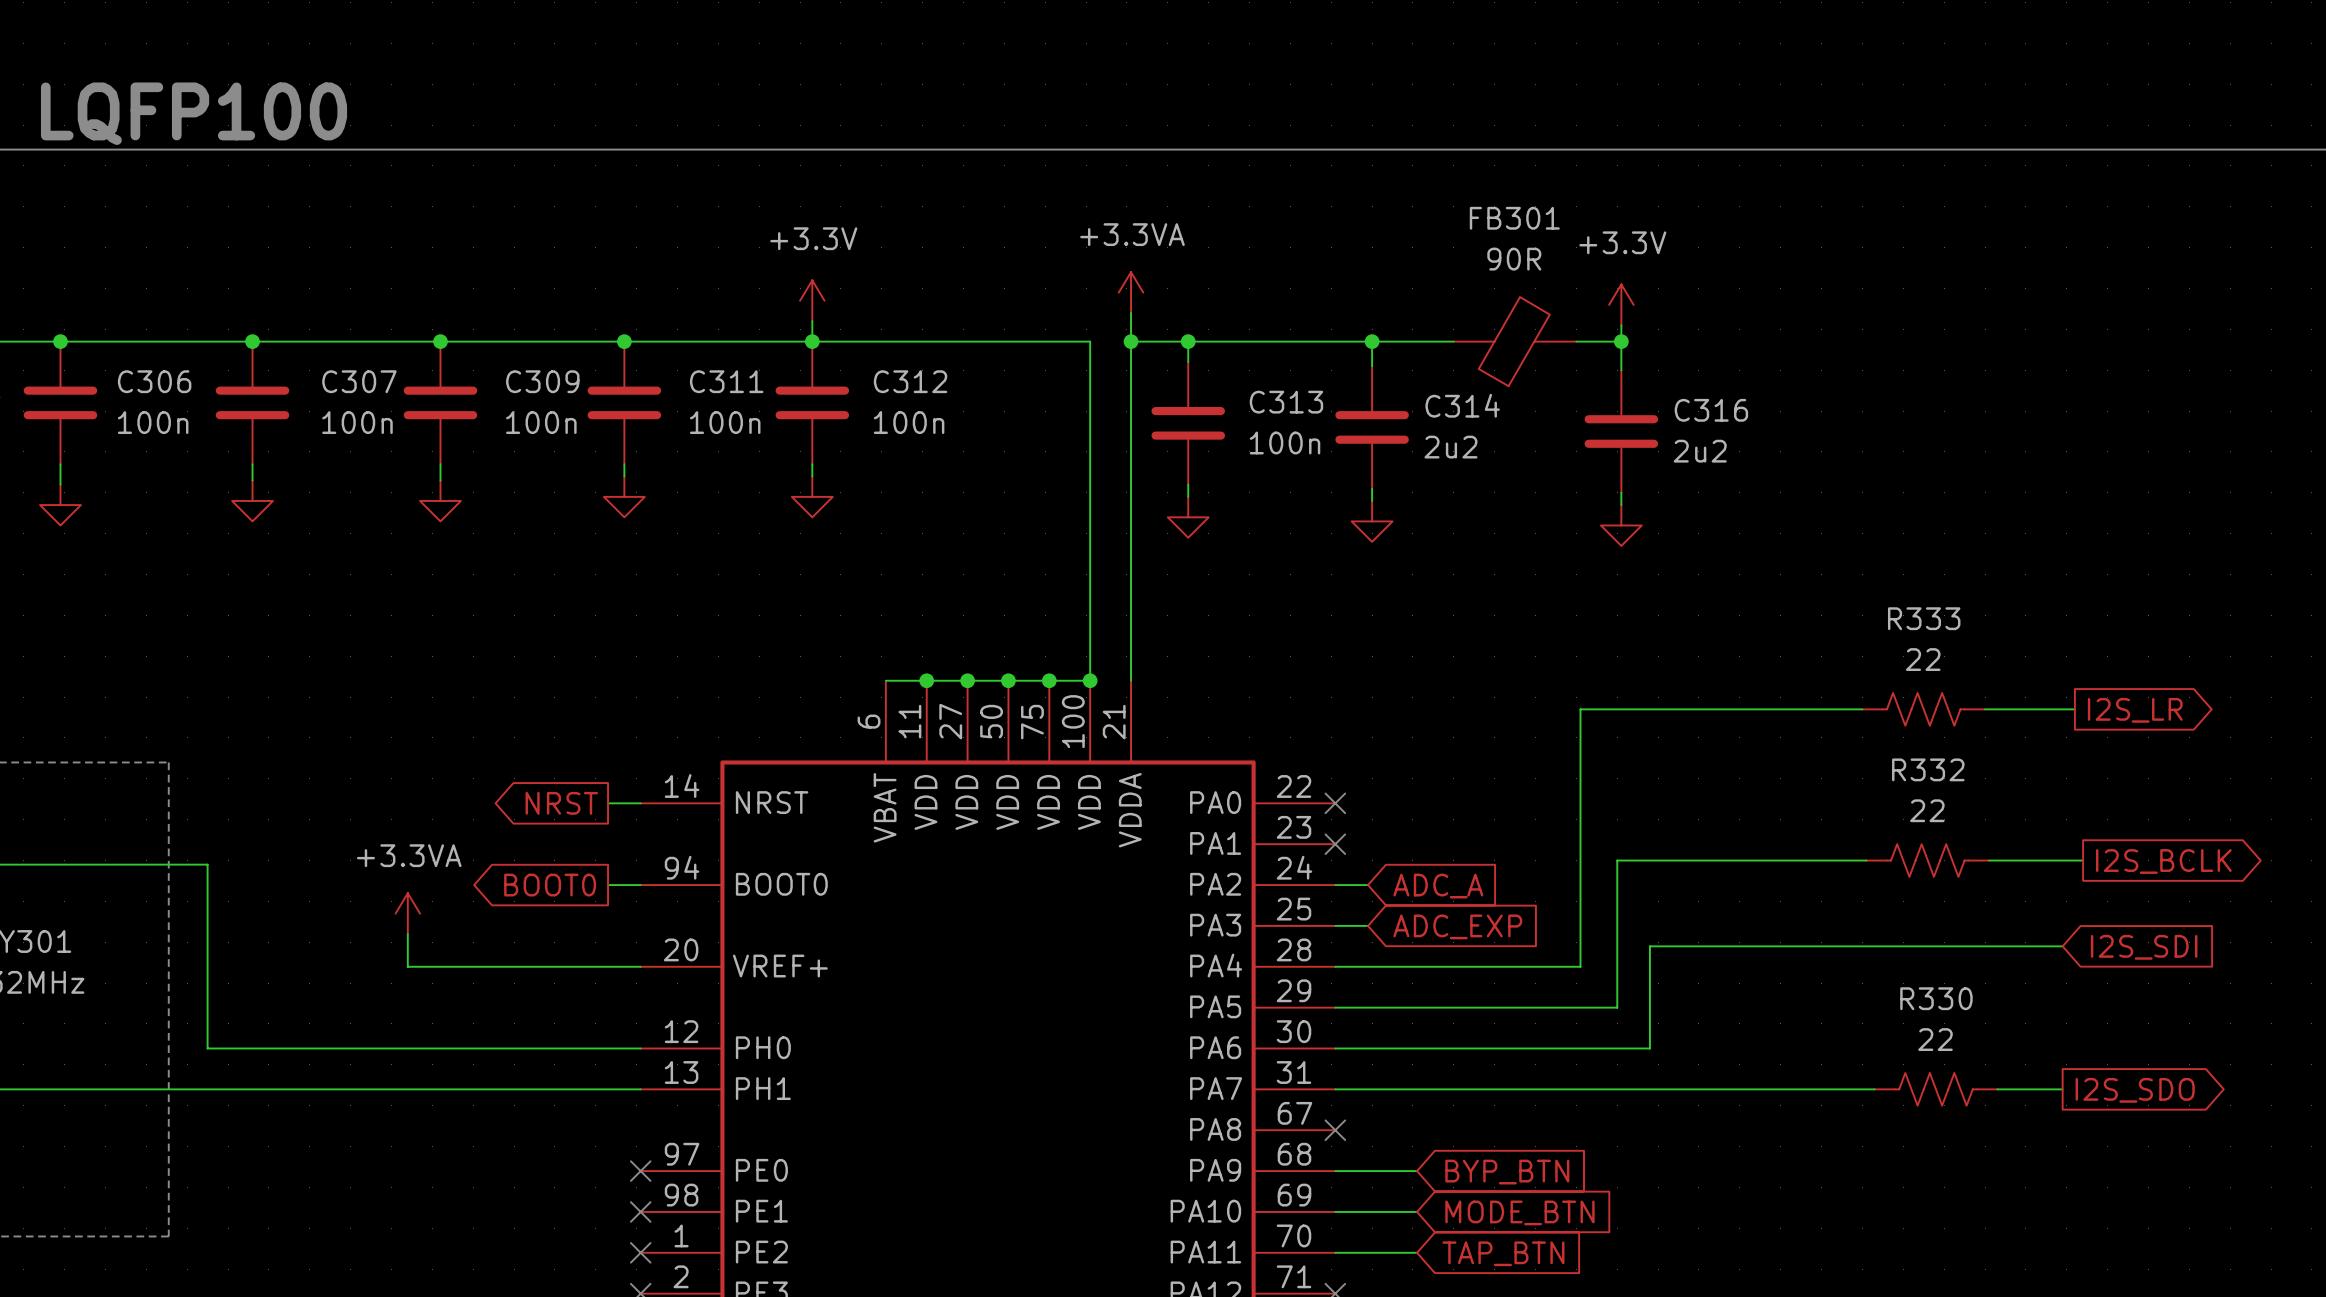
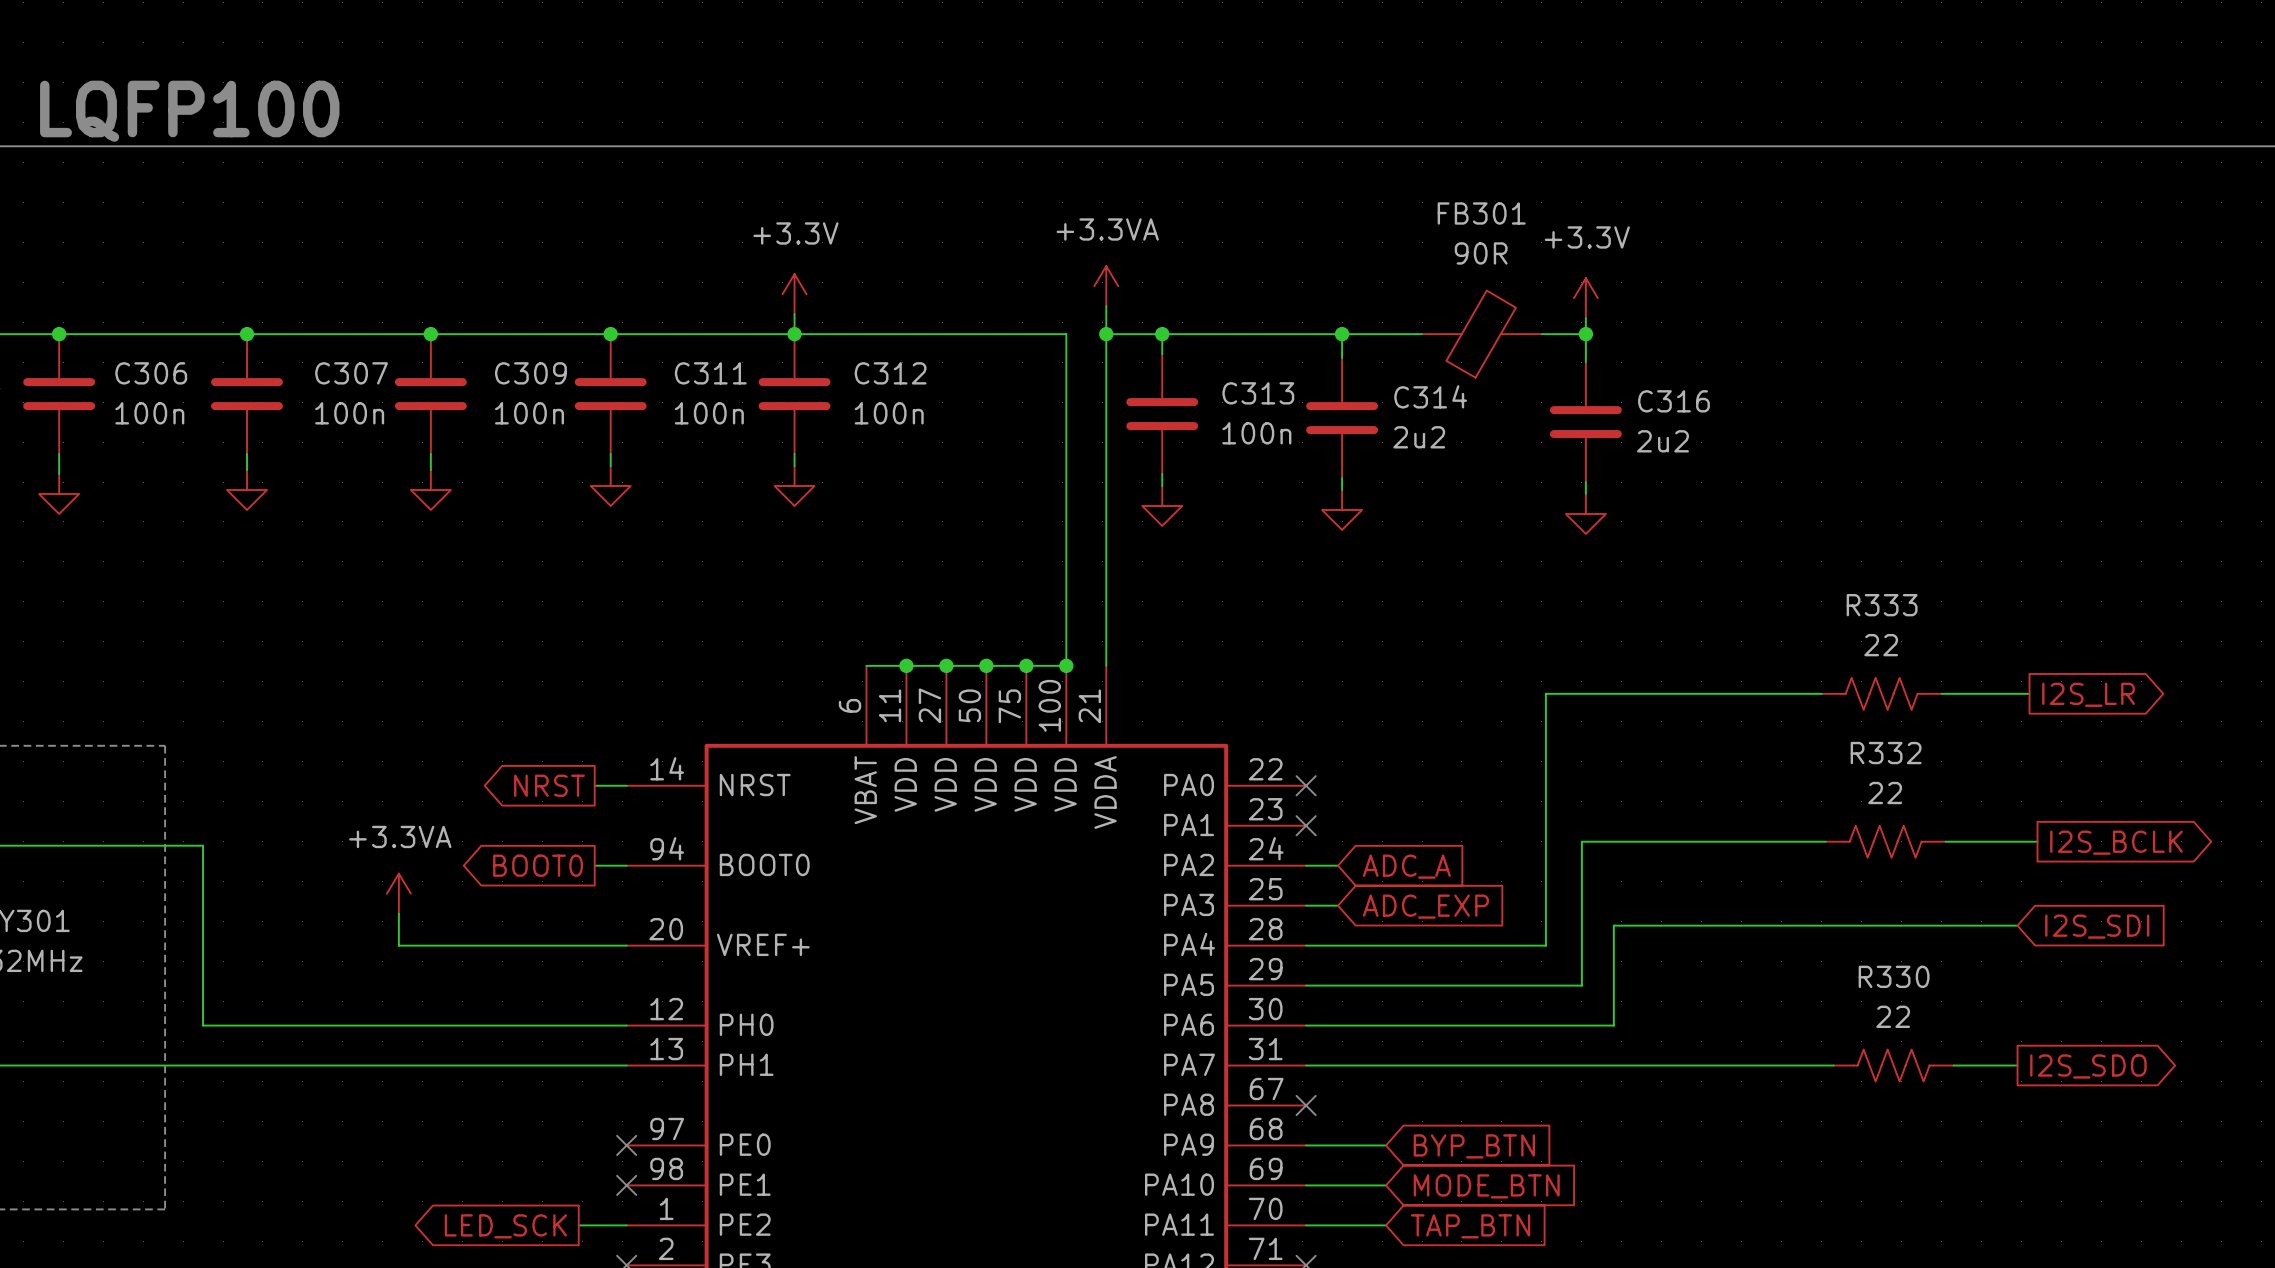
wire: none -> (578, 1225) (626, 1225)
no-connect mark: (640, 1252) -> none
global label: none -> LED_SCK (505, 1226)

